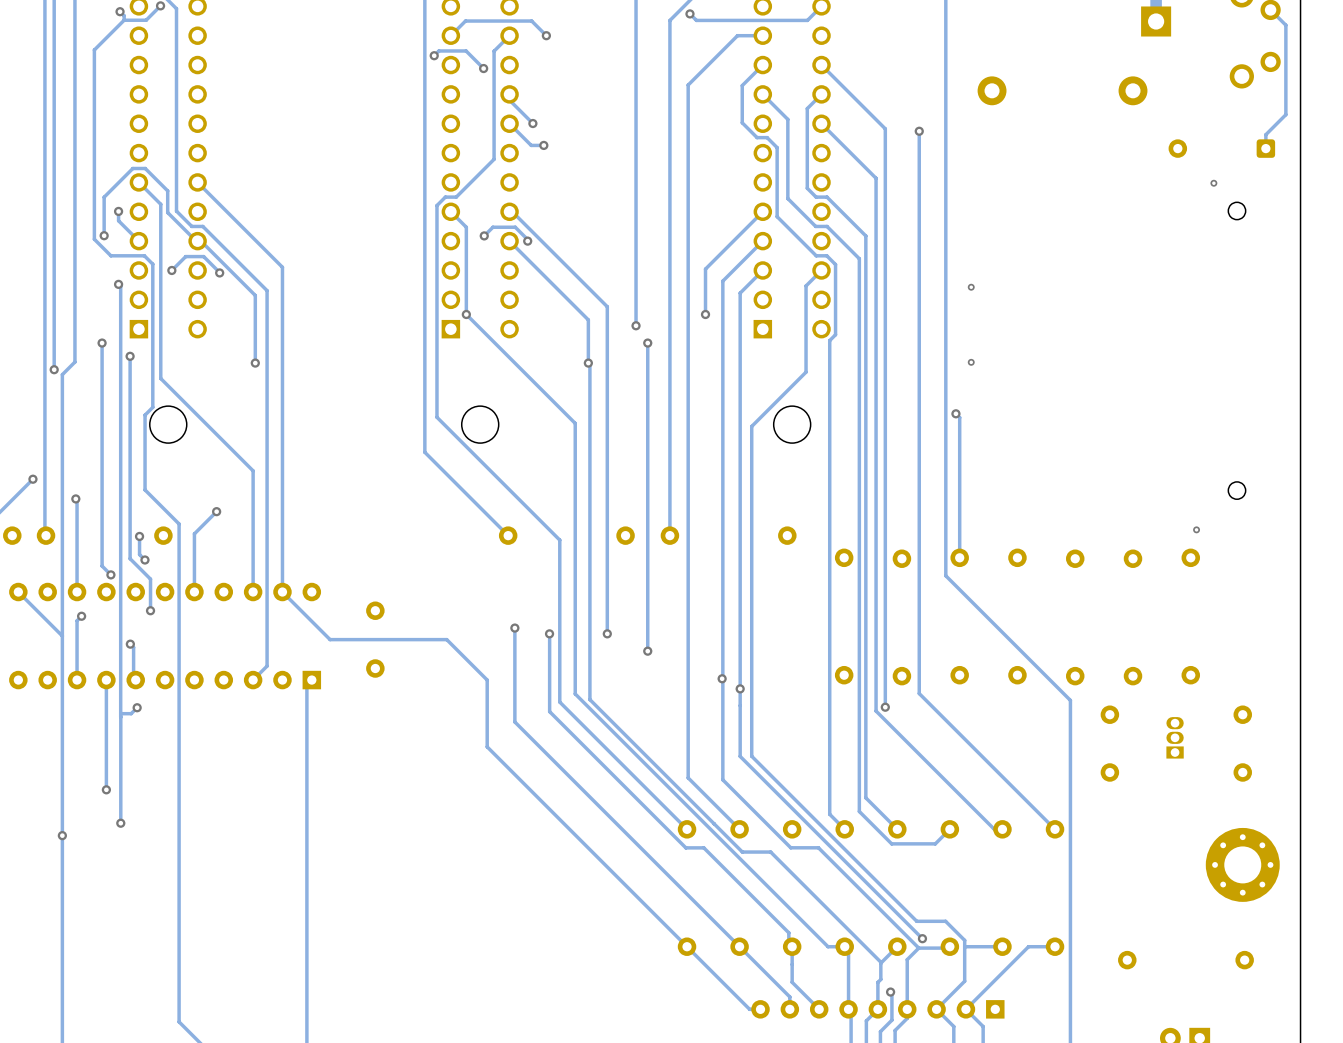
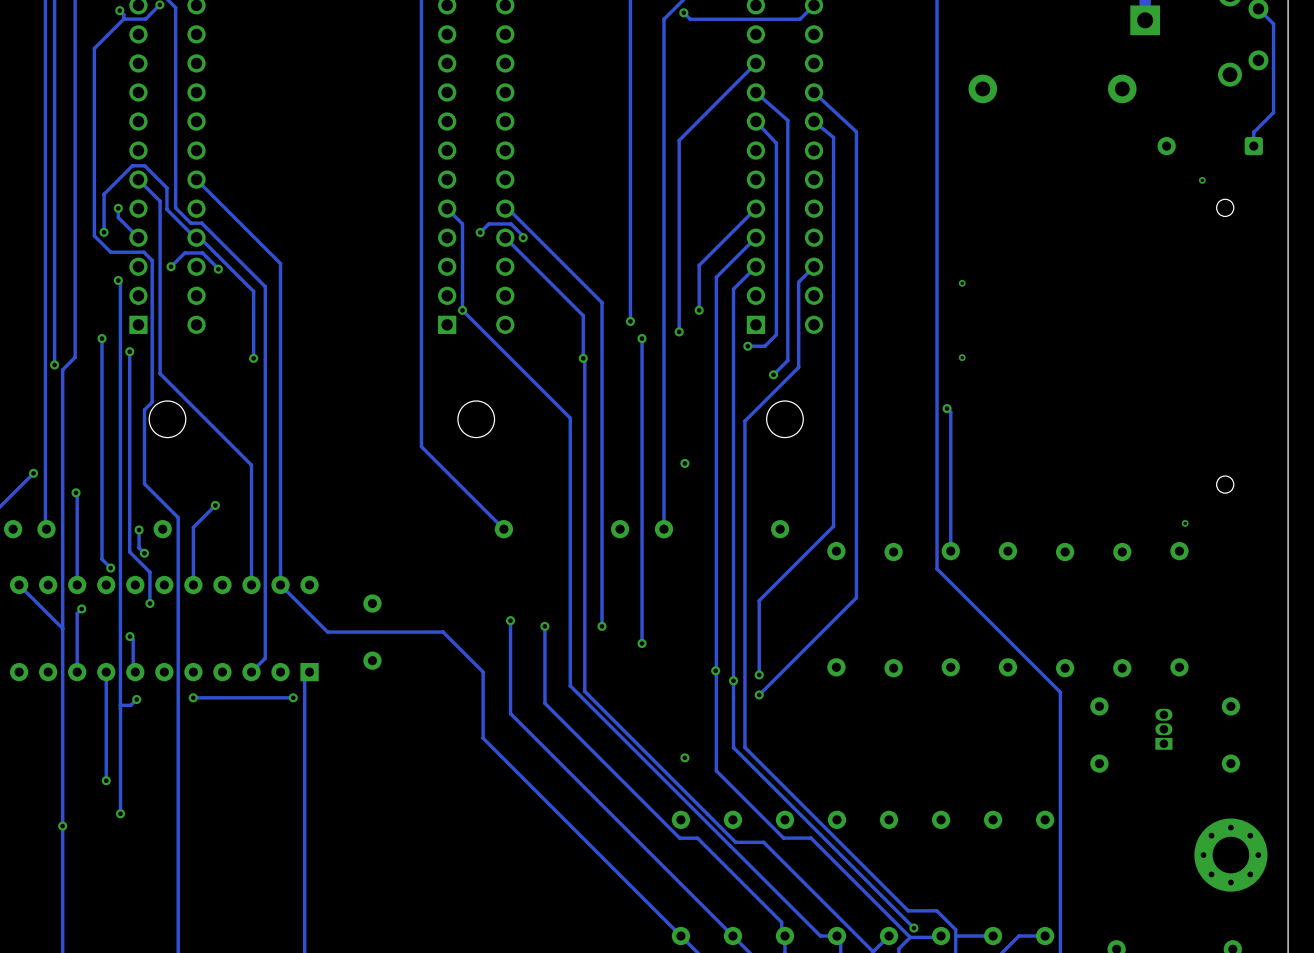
track: (509, 35) (494, 51) (494, 159) (456, 197) (445, 197) (436, 205) (436, 417) (559, 540) (559, 702) (687, 829) -> none
track: (546, 35) (531, 21) (465, 21) (450, 35) -> none
via: (546, 35) -> none
track: (762, 35) (737, 35) (688, 85) (688, 777) (739, 829) -> none
track: (434, 55) (438, 50) (466, 50) (483, 68) -> none
via: (434, 55) -> none
track: (762, 65) (742, 85) (742, 122) (757, 137) (767, 137) (777, 147) (777, 216) (816, 255) (826, 255) (835, 264) (835, 334) (829, 340) (829, 814) (844, 829) -> (755, 63) (679, 140) (679, 331)
track: (821, 65) (885, 128) (885, 707) -> none
via: (483, 68) -> none
track: (509, 94) (509, 100) (532, 123) -> none
track: (762, 94) (787, 119) (787, 198) (815, 226) (827, 226) (859, 258) (859, 811) (891, 843) (935, 843) (949, 829) -> (755, 92) (787, 120) (787, 360) (773, 374)
track: (821, 94) (807, 108) (807, 188) (816, 197) (826, 197) (865, 235) (865, 797) (897, 829) -> (814, 92) (856, 131) (856, 597) (759, 694)
track: (509, 123) (531, 145) (543, 145) -> none
via: (532, 123) -> none
track: none -> (755, 121) (776, 143) (776, 334) (764, 346) (747, 346)
track: (821, 123) (876, 178) (876, 711) (994, 829) (1002, 829) -> (814, 121) (833, 137) (833, 526) (759, 600) (759, 674)
track: (919, 131) (919, 693) (1055, 829) -> none
via: (919, 131) -> none
via: (543, 145) -> none
via: none -> (679, 331)
via: none -> (747, 346)
via: none -> (773, 374)
via: none -> (684, 463)
via: none -> (759, 674)
via: none -> (759, 694)
via: none -> (193, 697)
track: none -> (293, 697) (193, 697)
via: none -> (293, 697)
via: (885, 707) -> none
via: none -> (684, 757)

